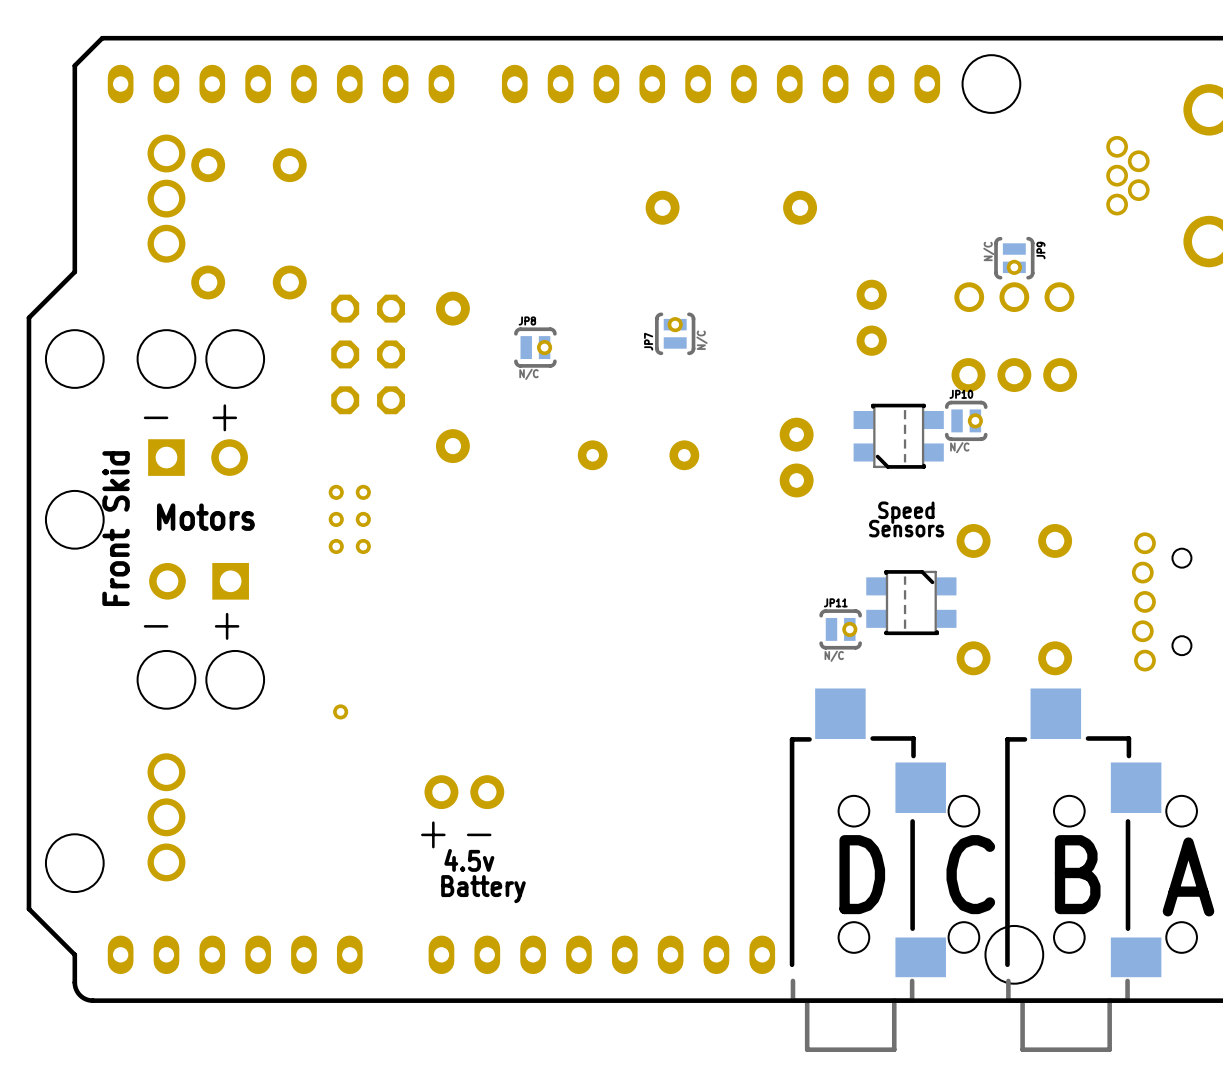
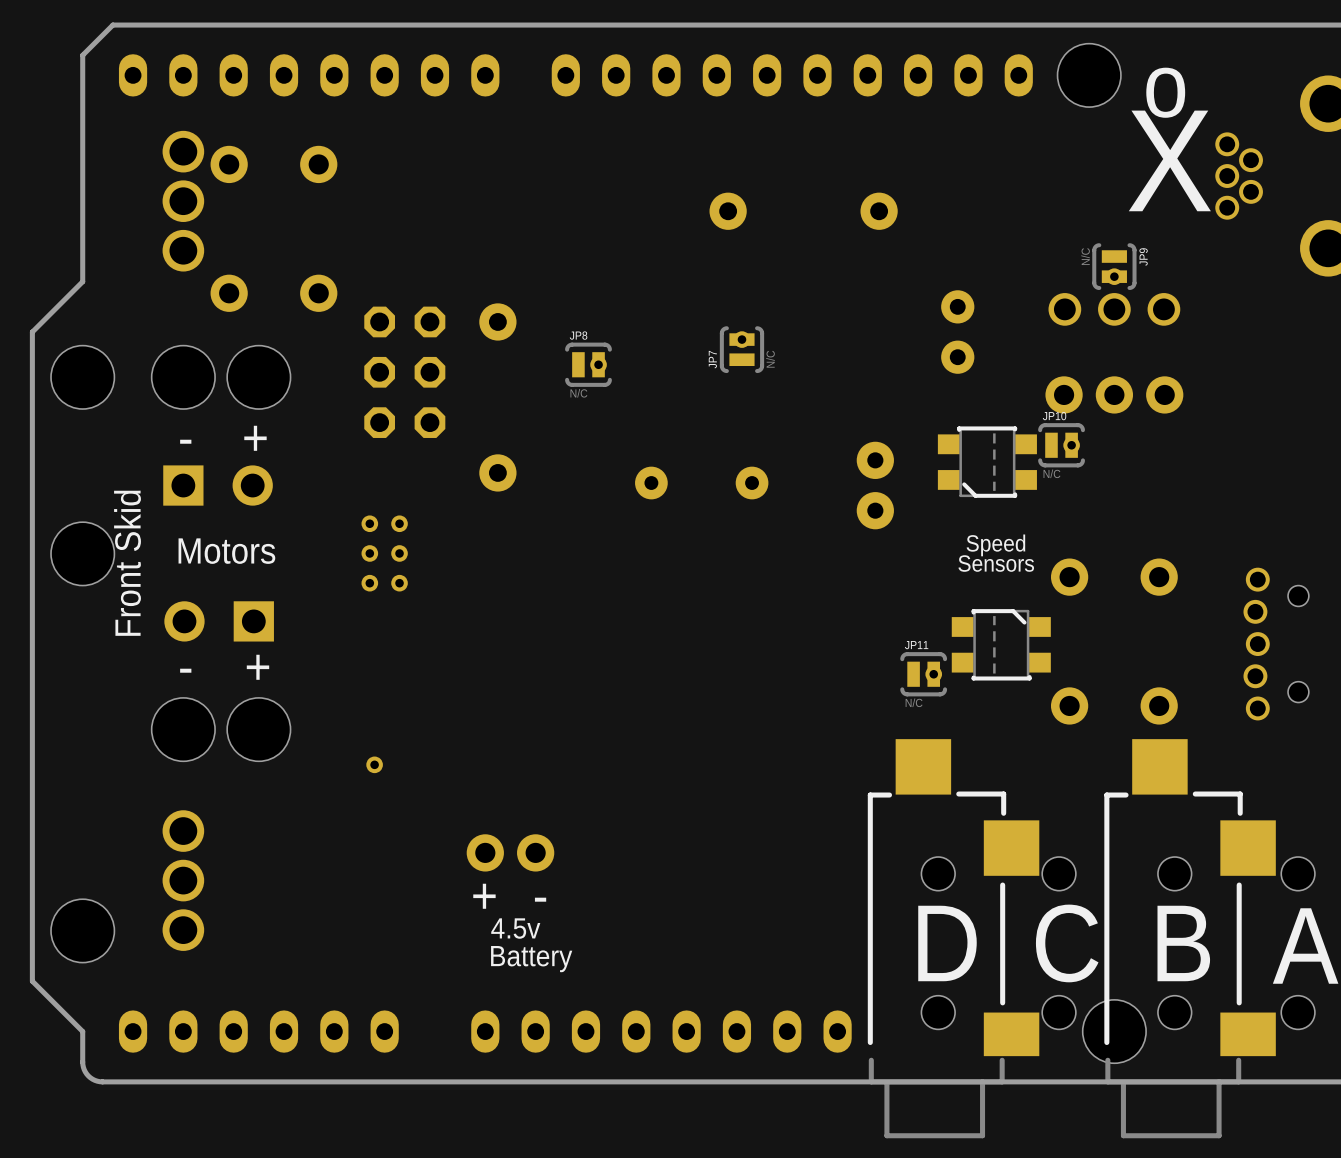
text: none -> o (1165, 92)
text: none -> X (1169, 160)

